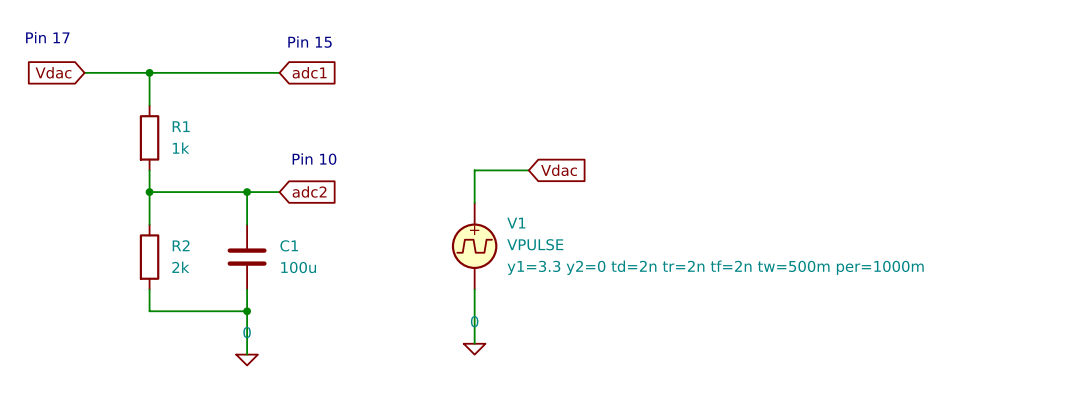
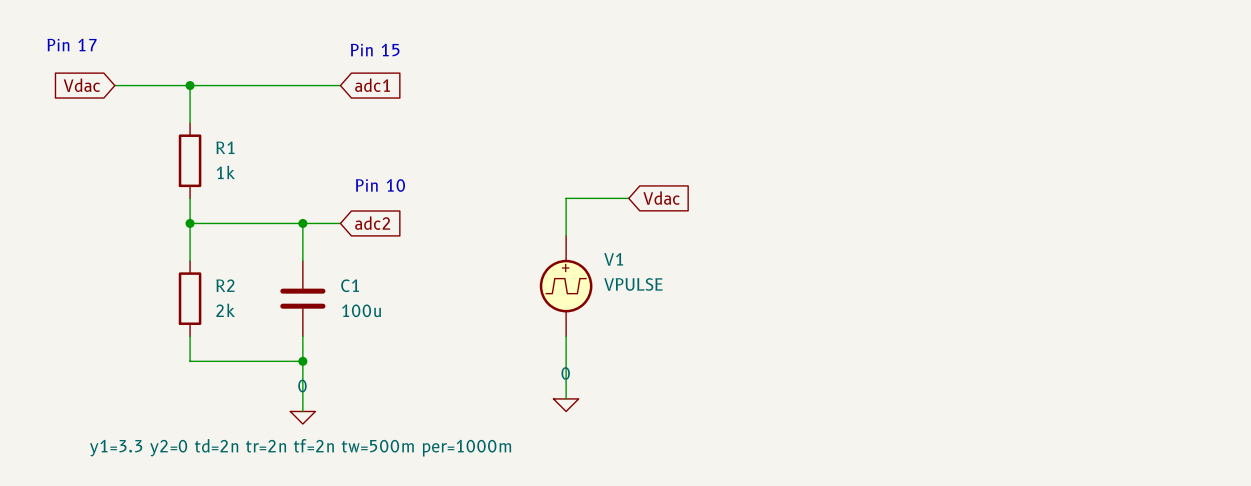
V1 text position: y1=3.3 y2=0 td=2n tr=2n tf=2n tw=500m per=1000m (715, 267) -> y1=3.3 y2=0 td=2n tr=2n tf=2n tw=500m per=1000m (300, 447)

